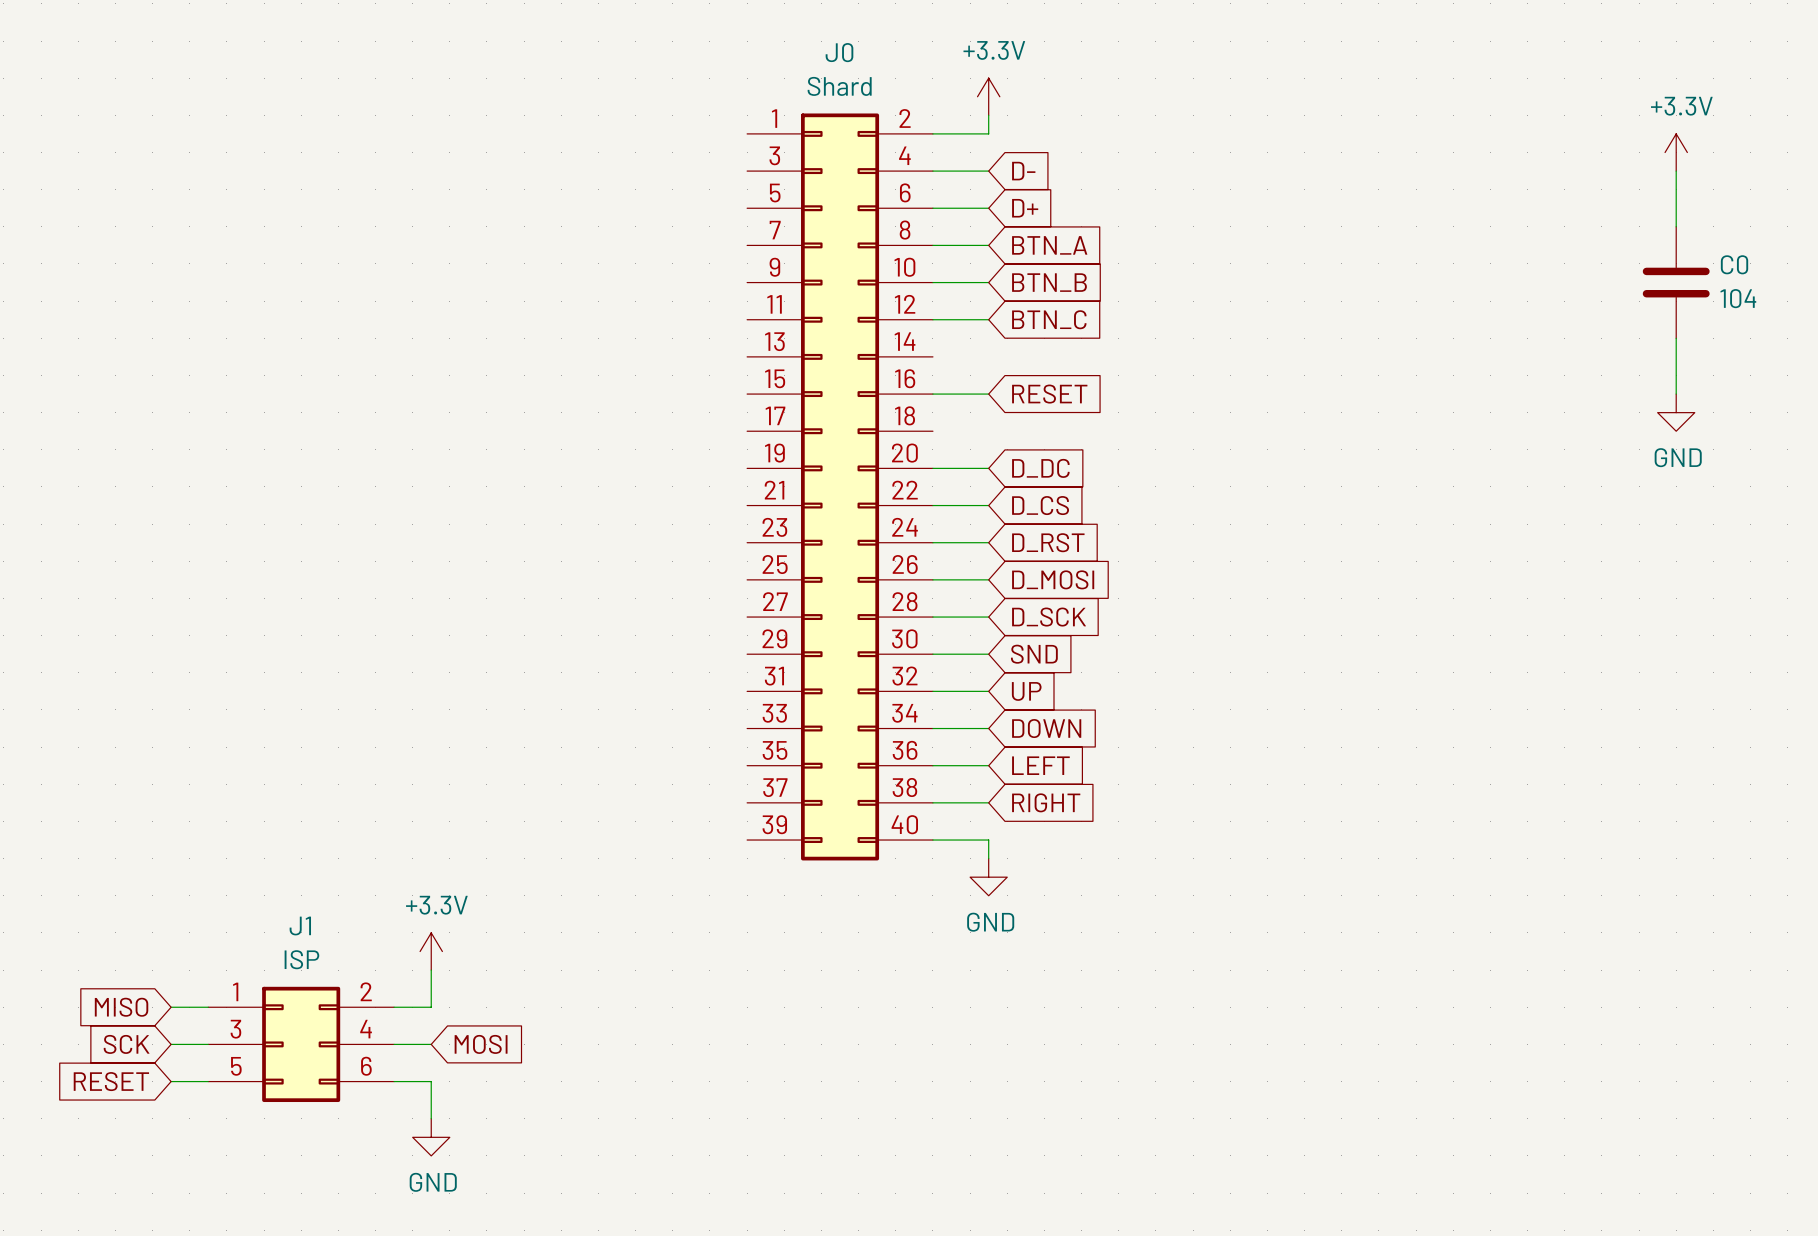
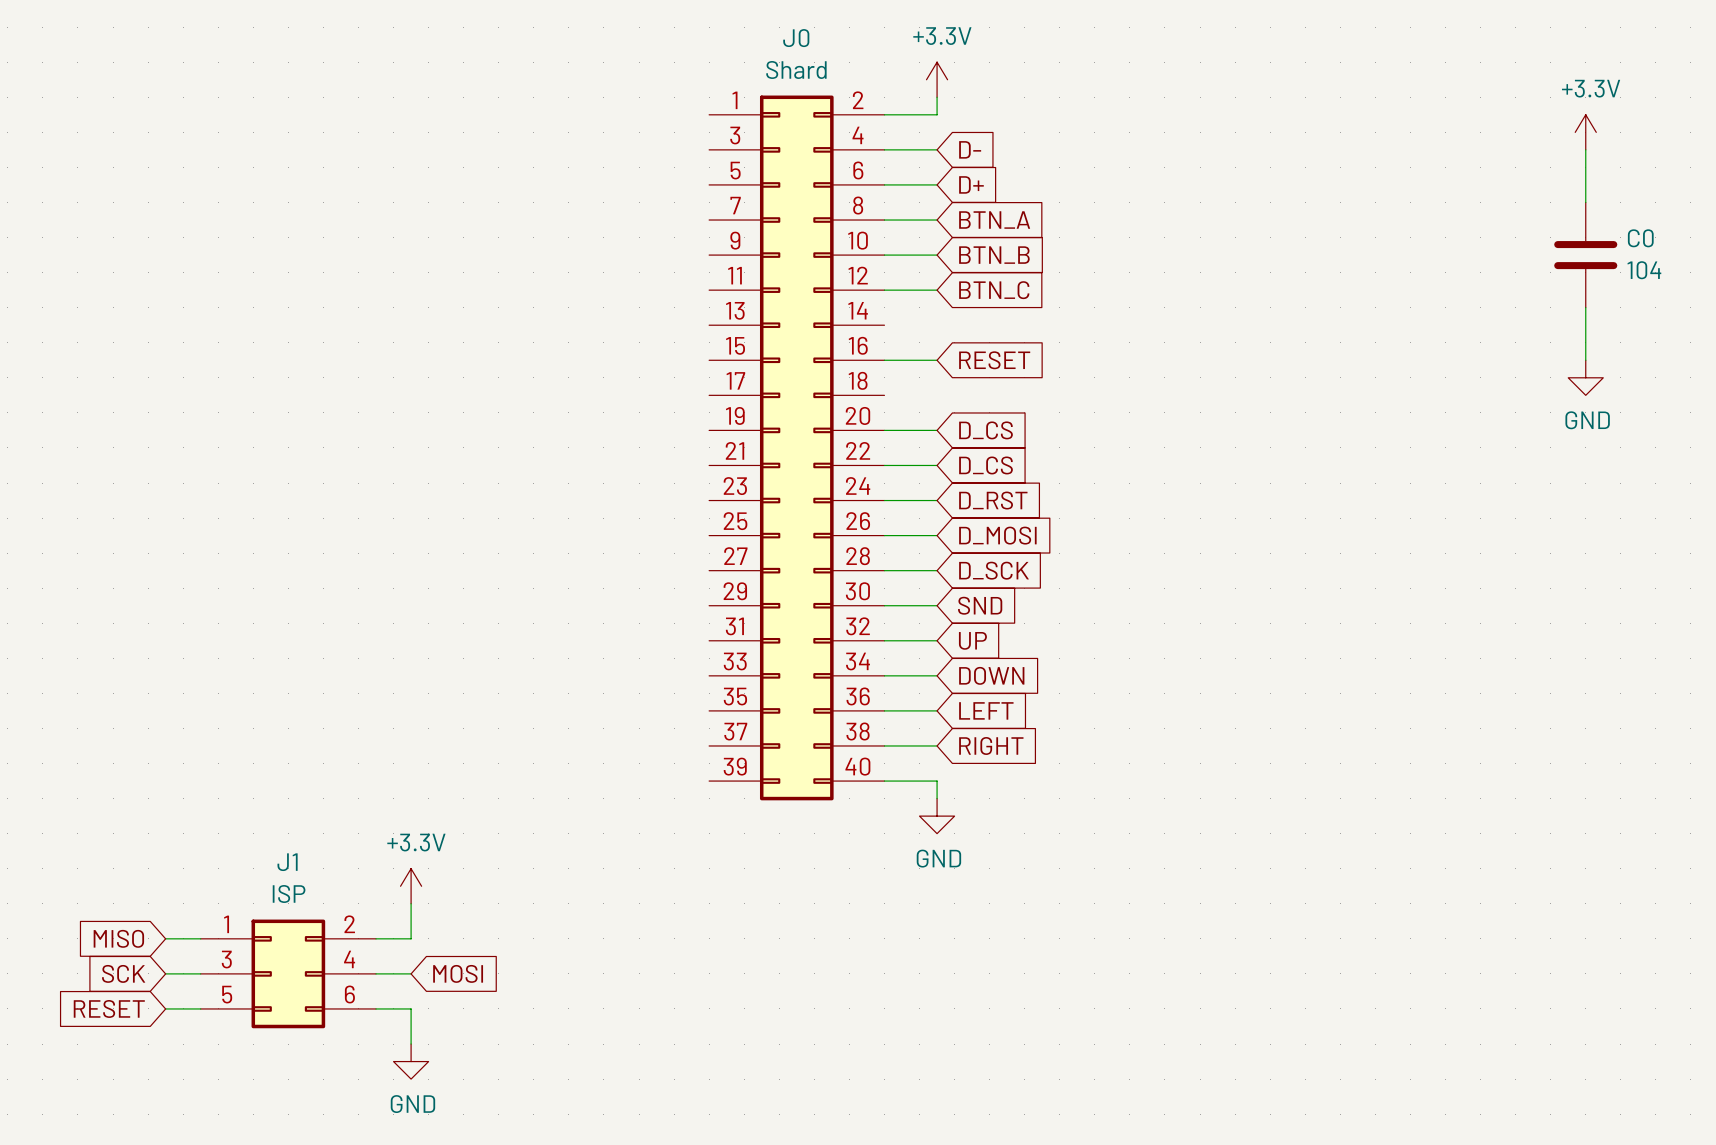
global label: D_DC (1040, 468) -> D_CS (985, 430)

